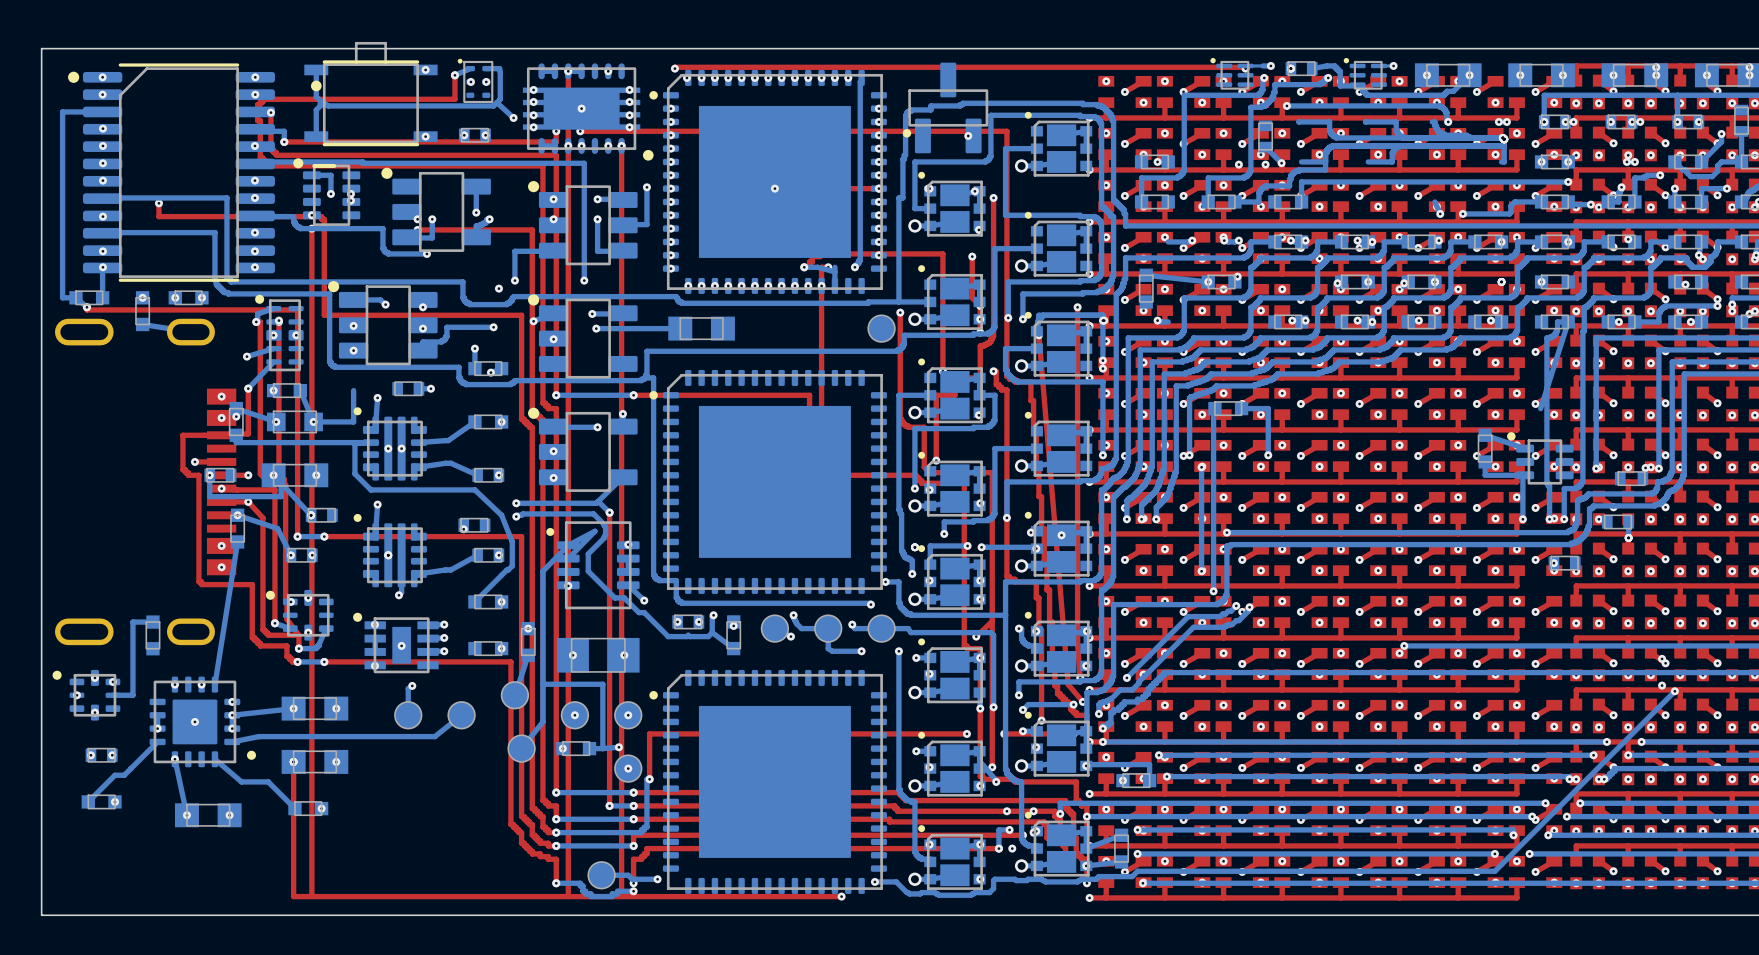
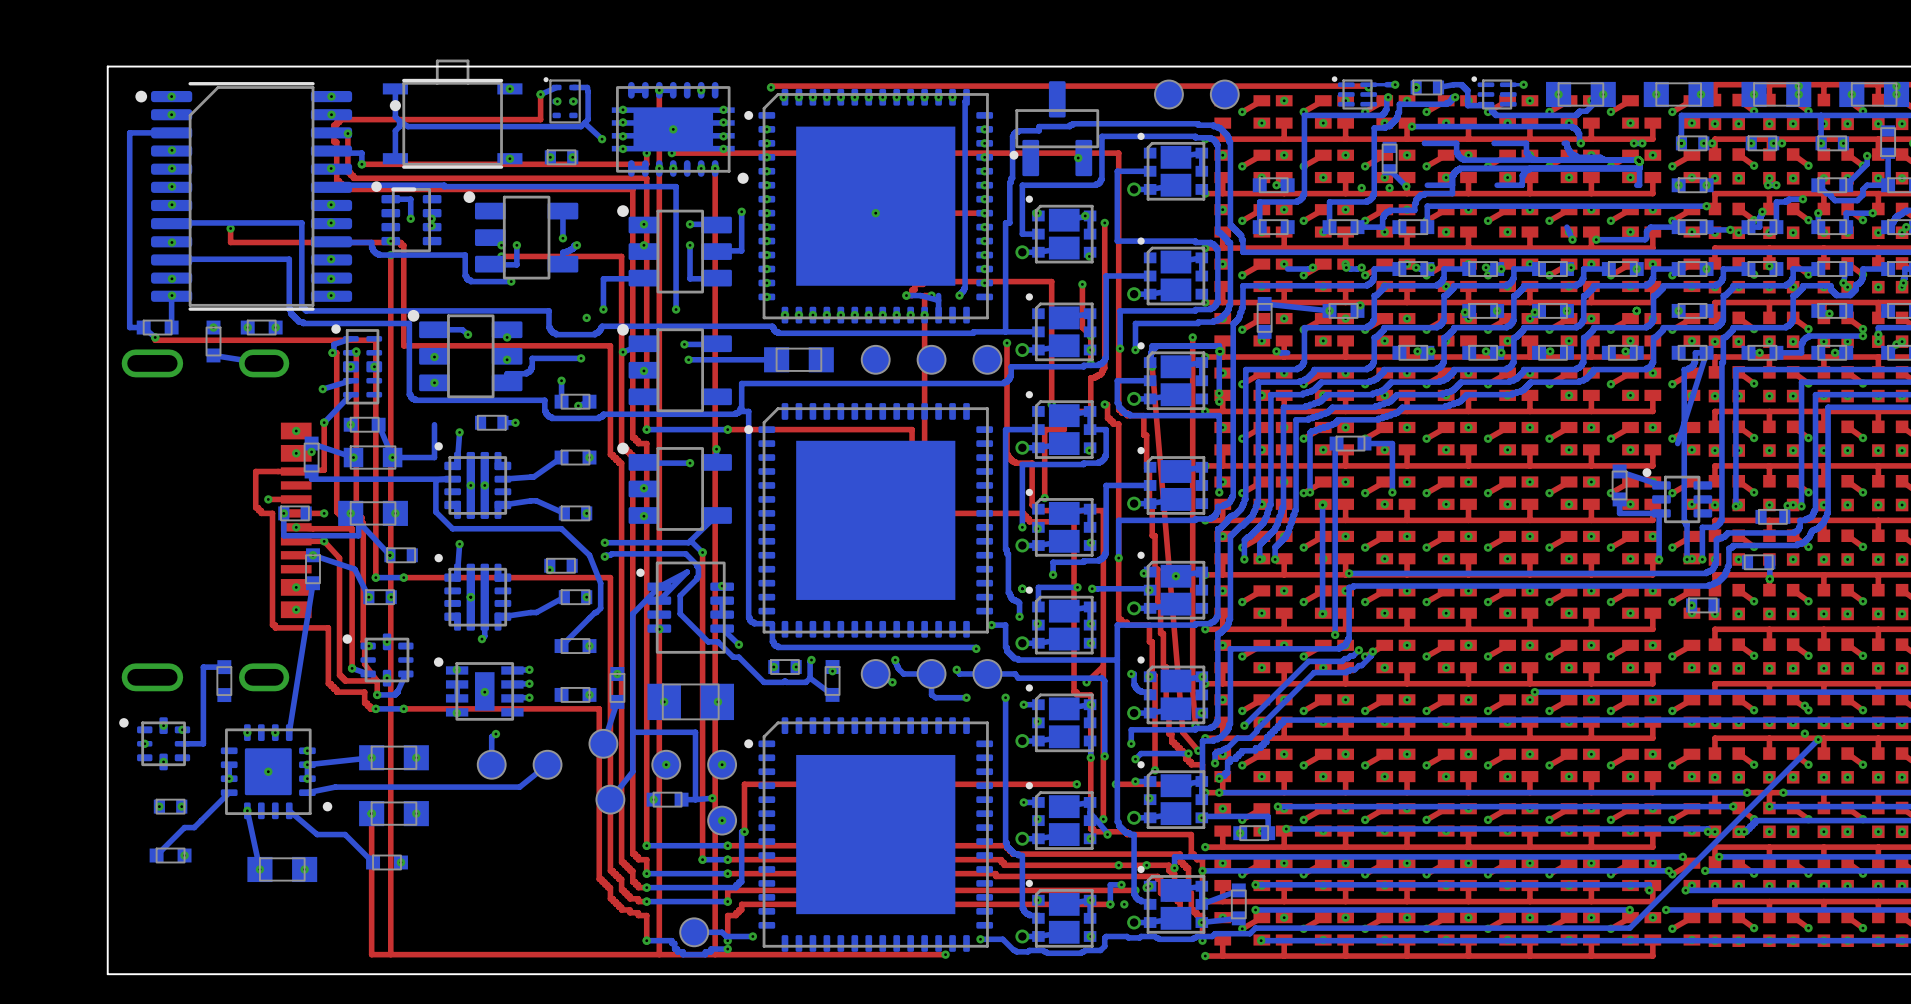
part: none -> (1168, 94)
part: none -> (1224, 94)
part: none -> (875, 359)
part: none -> (931, 359)

